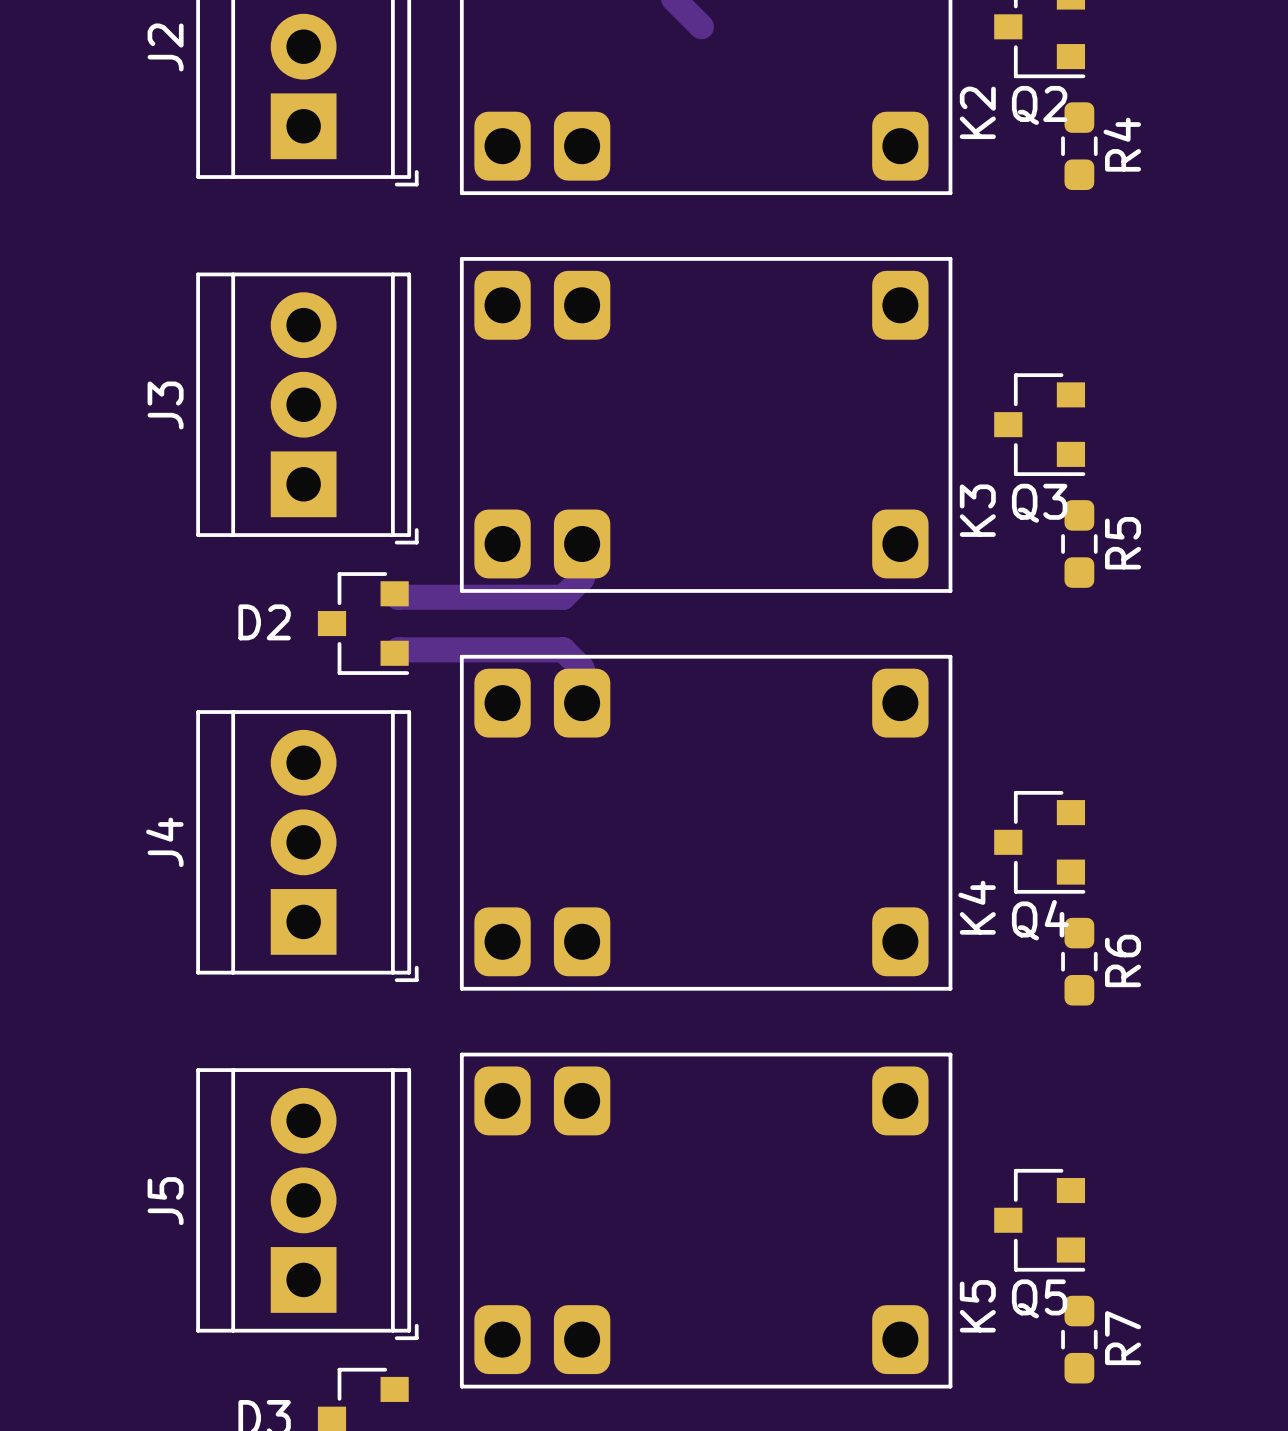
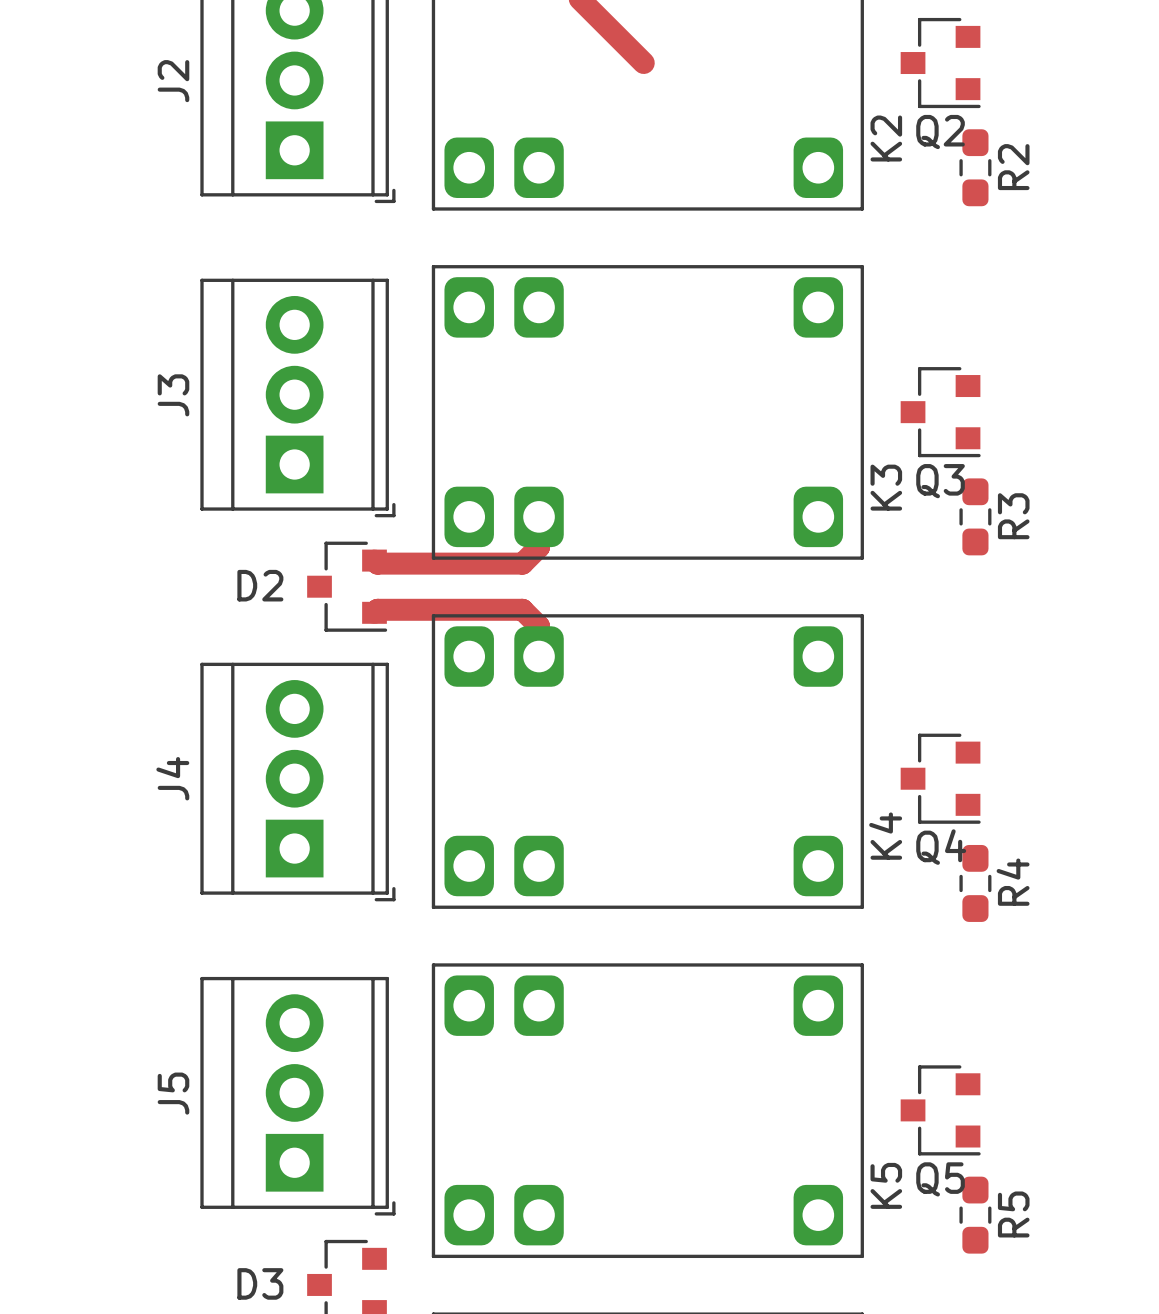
R4 name: R4 (1122, 144) -> R2 (1013, 167)
R5 name: R5 (1123, 543) -> R3 (1013, 516)
R6 name: R6 (1123, 960) -> R4 (1013, 882)
R7 name: R7 (1123, 1338) -> R5 (1013, 1214)

